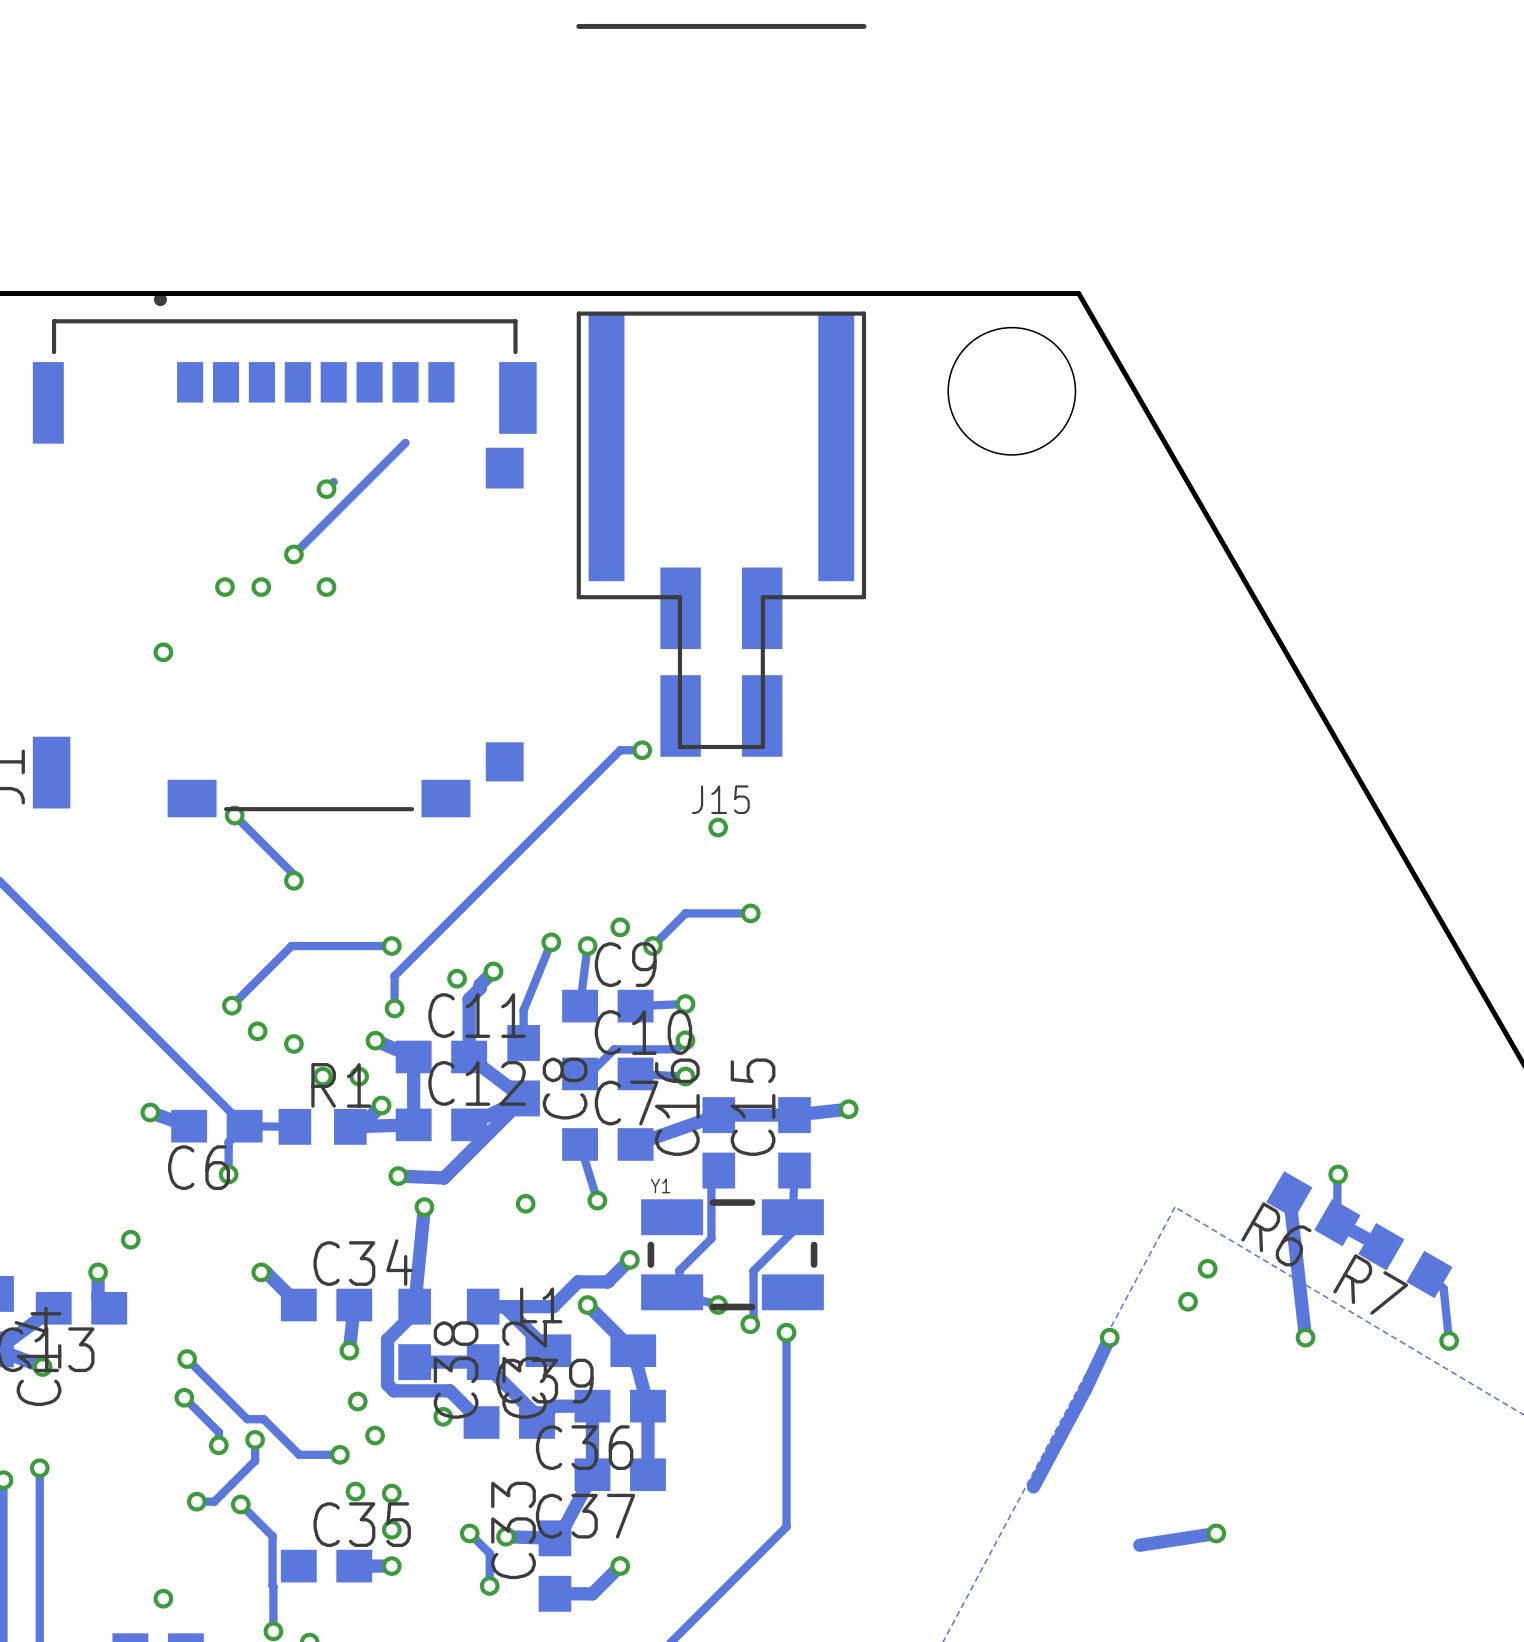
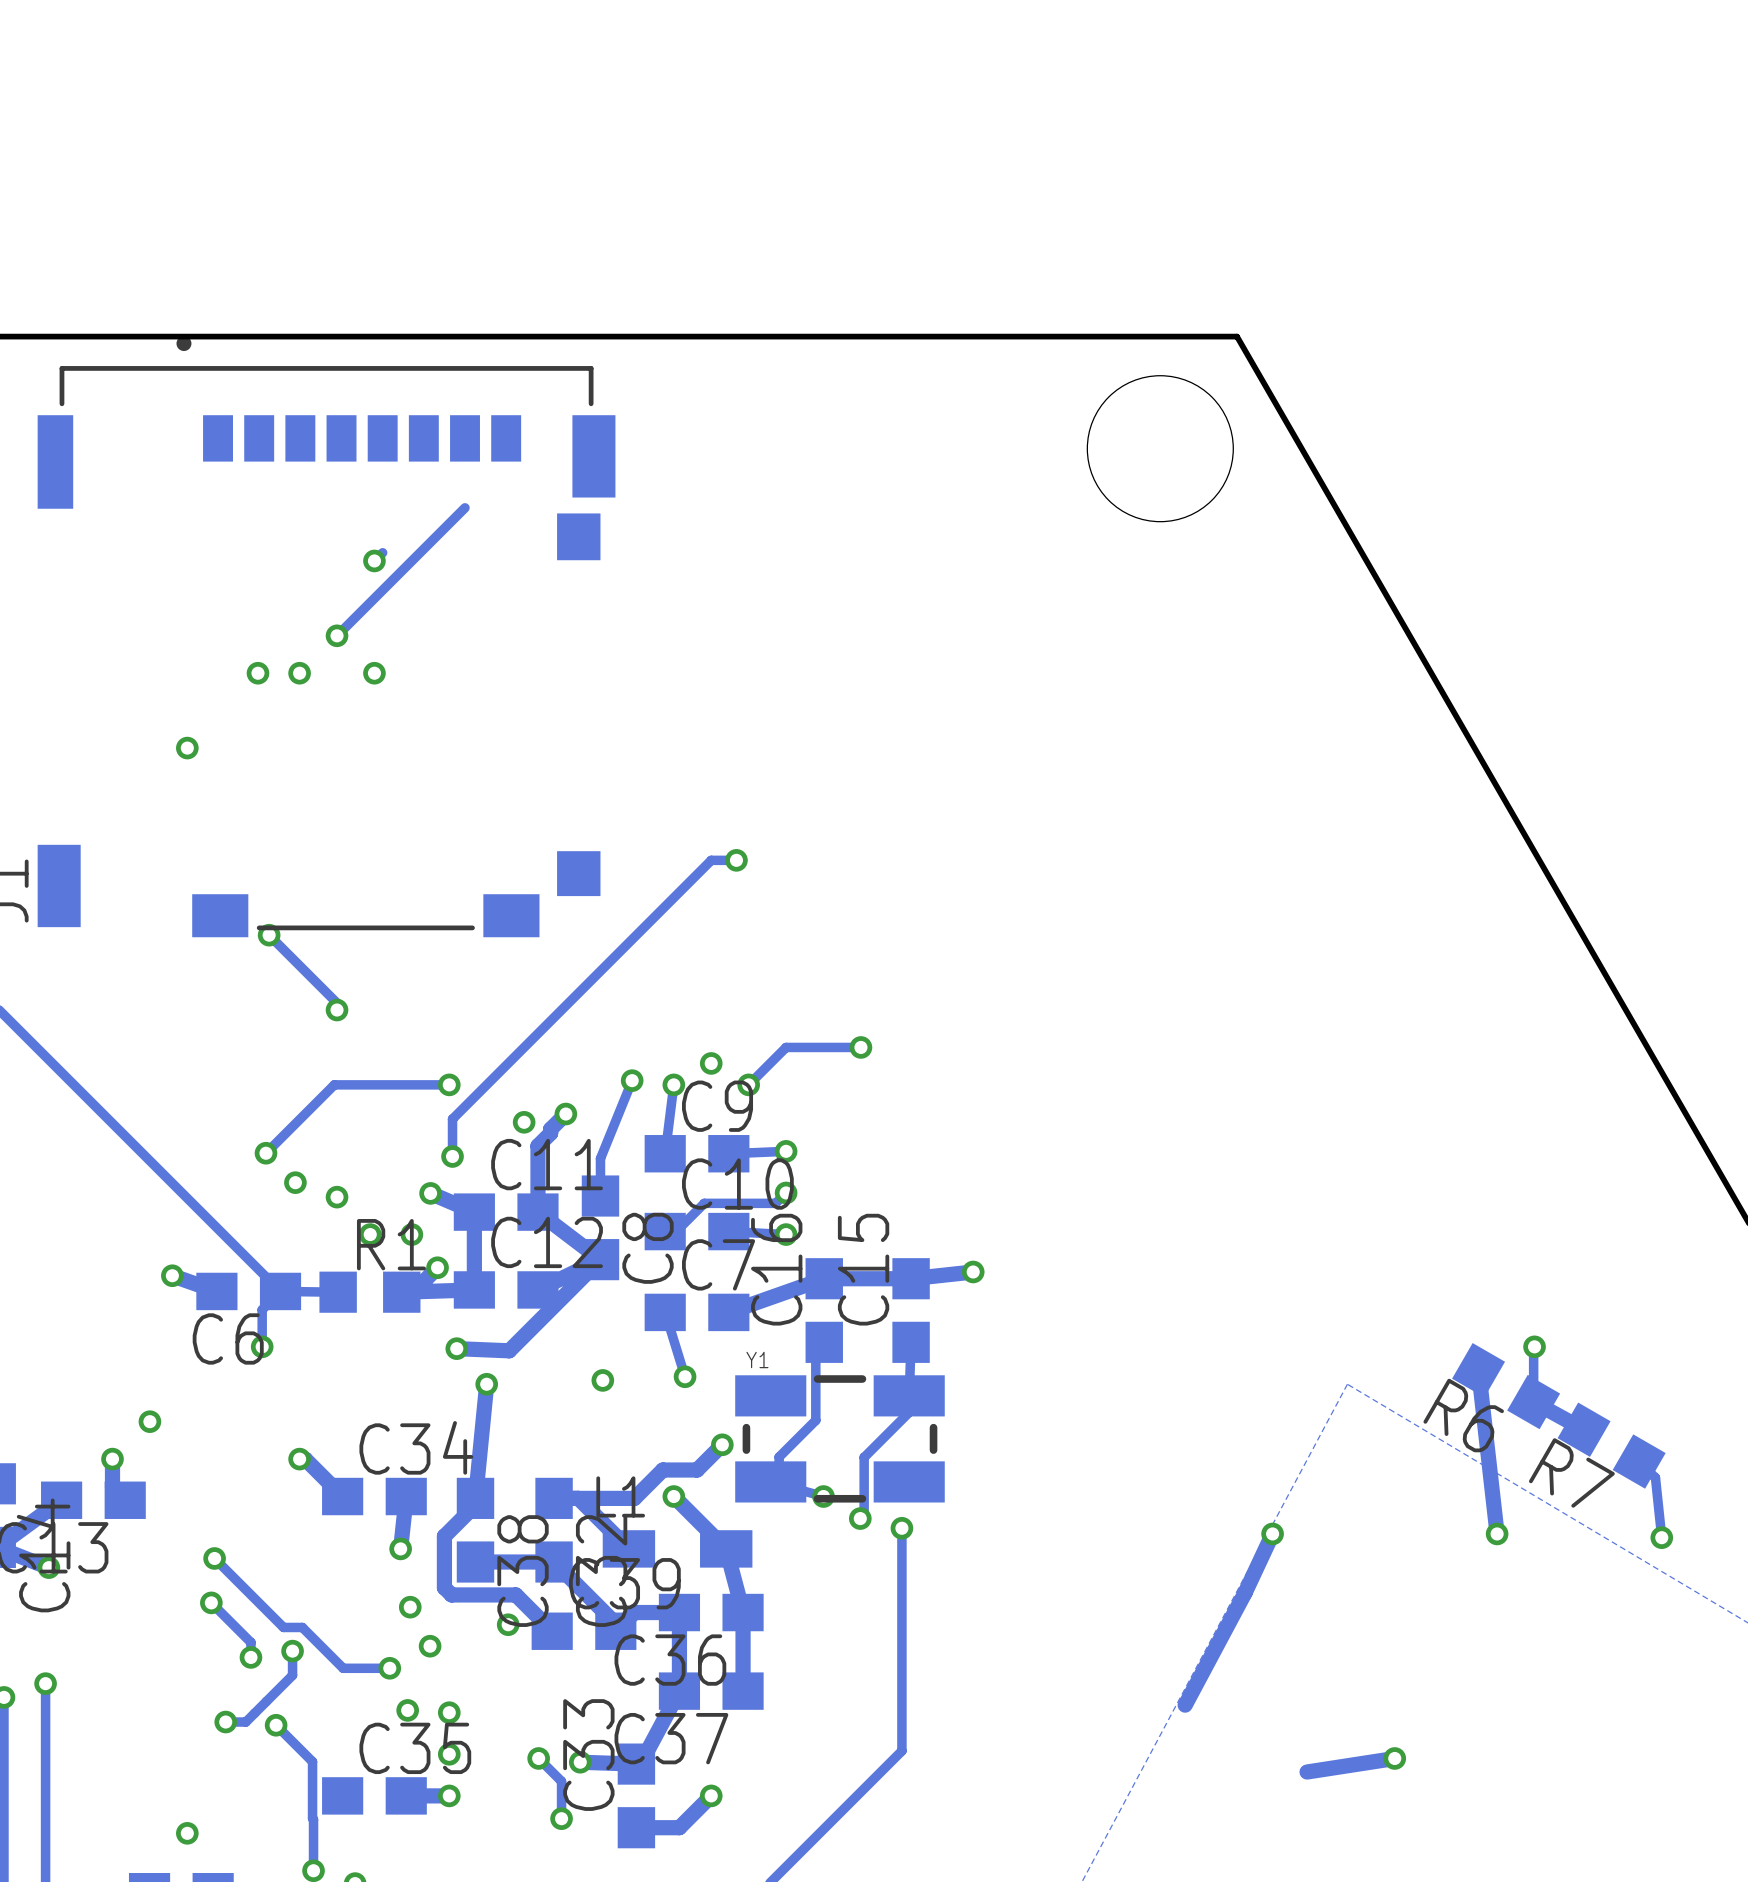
J15: (721, 390) -> none
via: (718, 827) -> none
via: (1207, 1268) -> none
via: (1188, 1301) -> none

